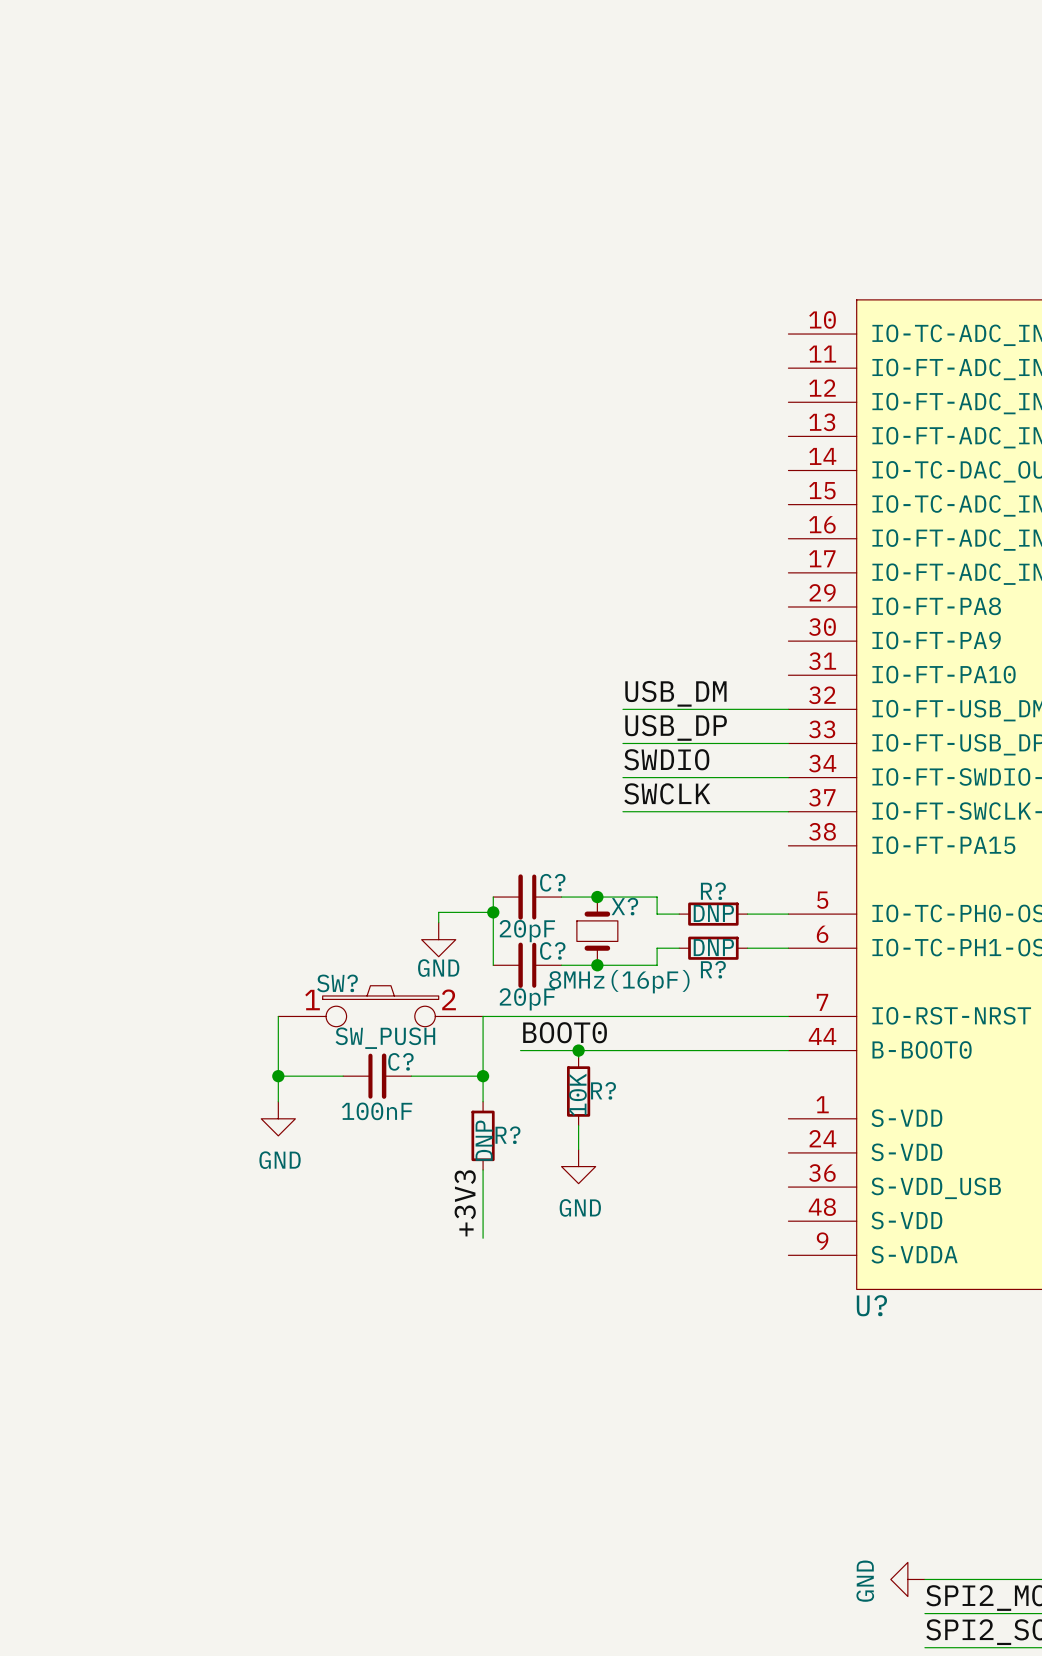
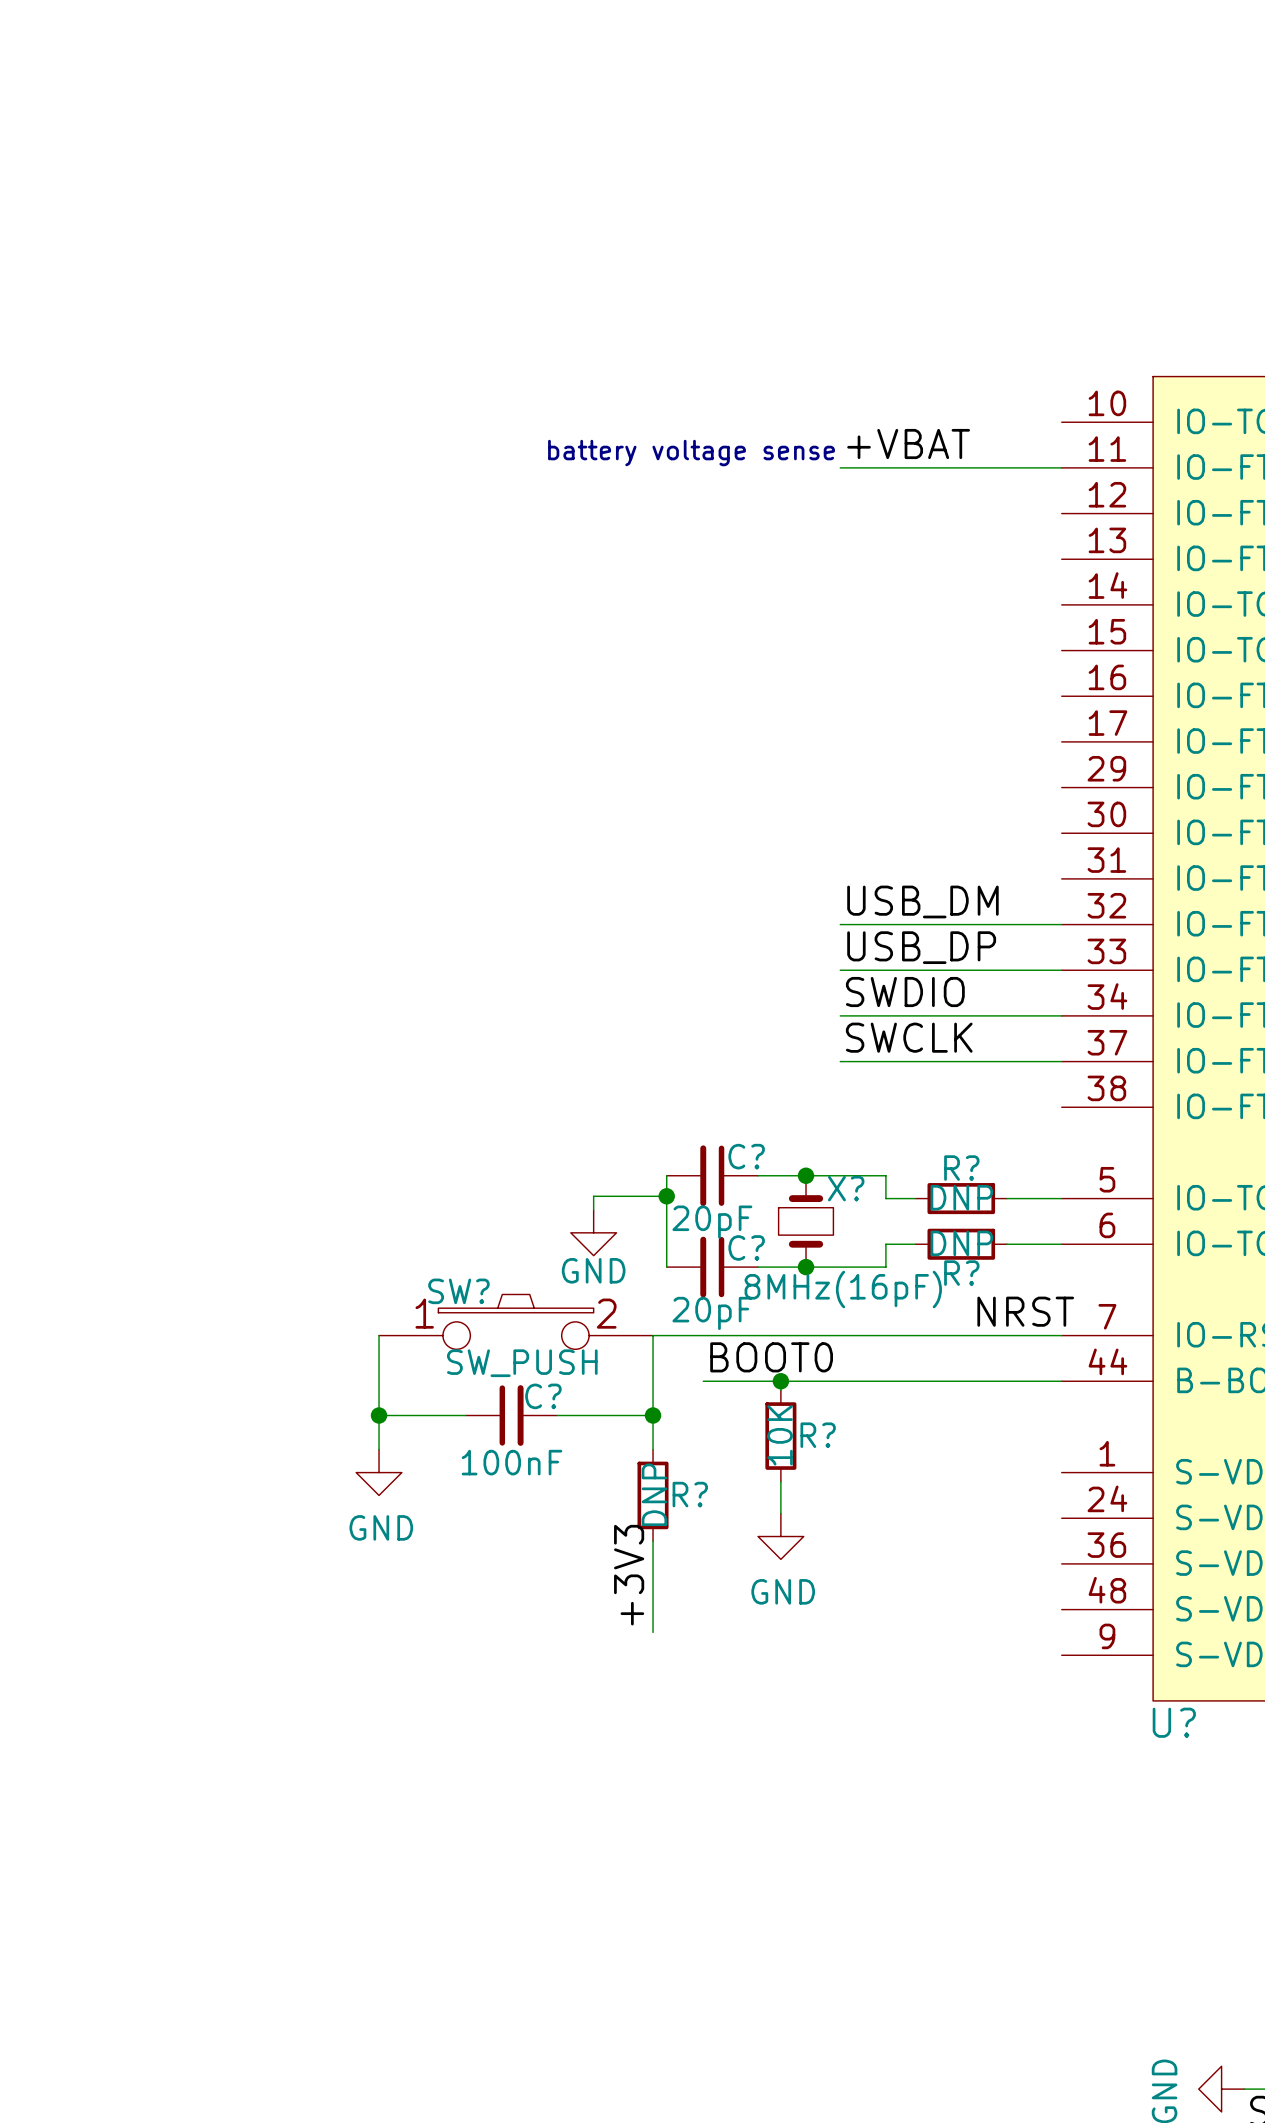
label: none -> +VBAT (908, 444)
text: none -> battery voltage sense (691, 453)
wire: none -> (840, 467) (1061, 467)
label: none -> NRST (1025, 1311)

